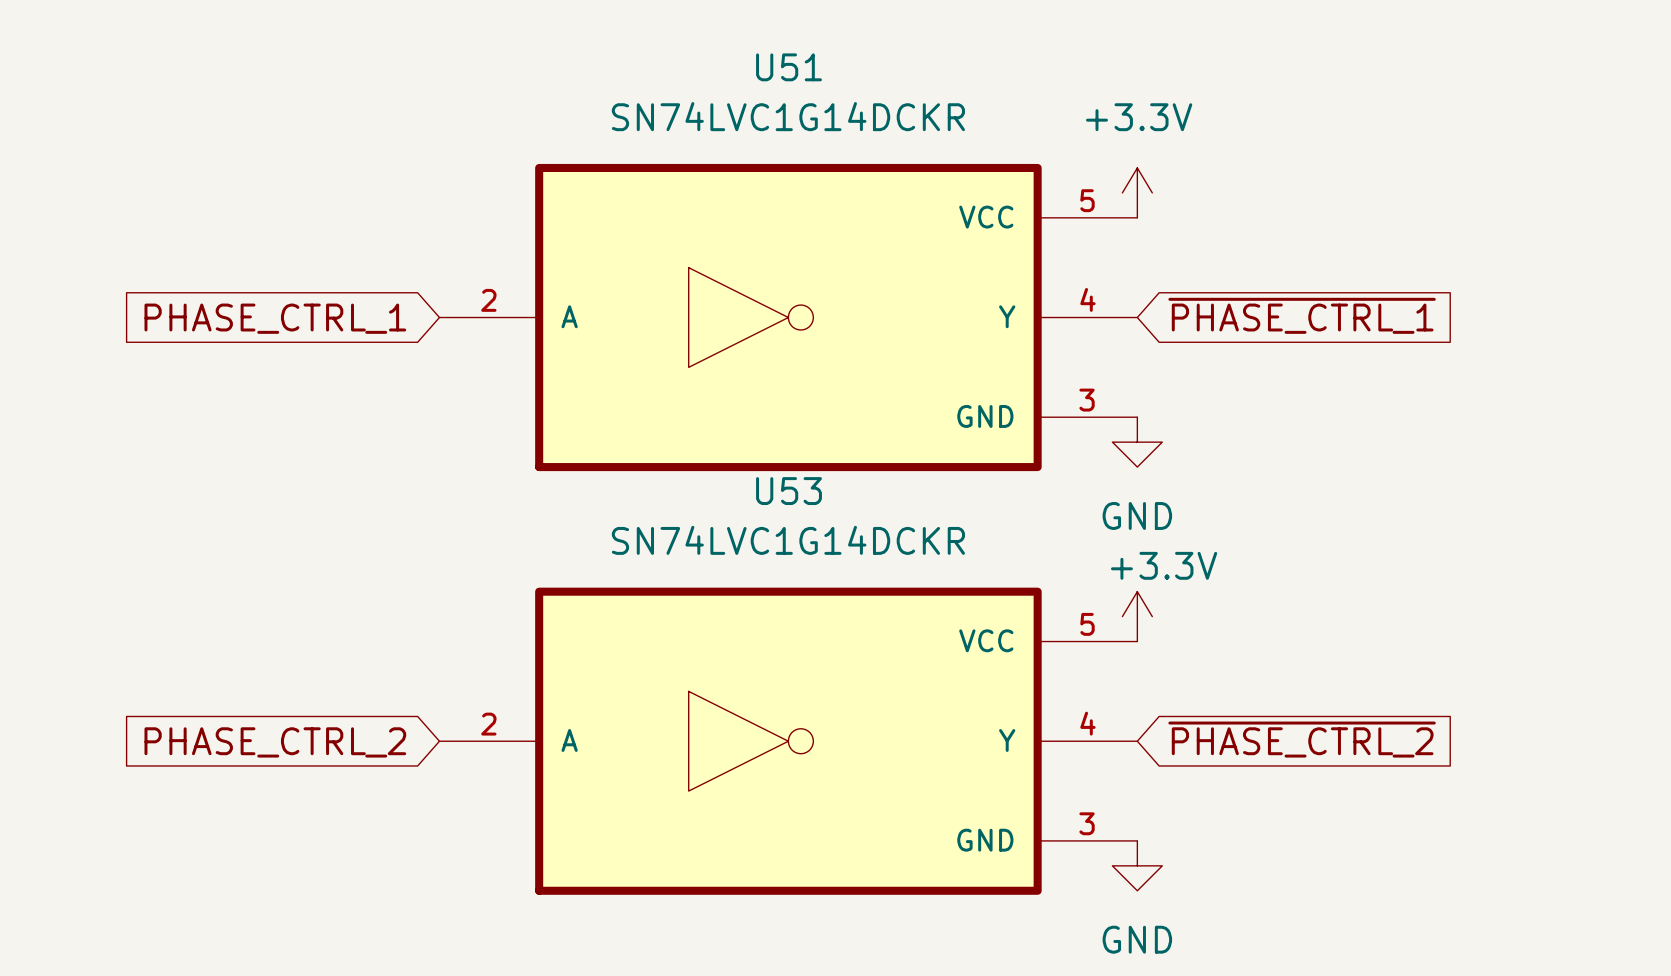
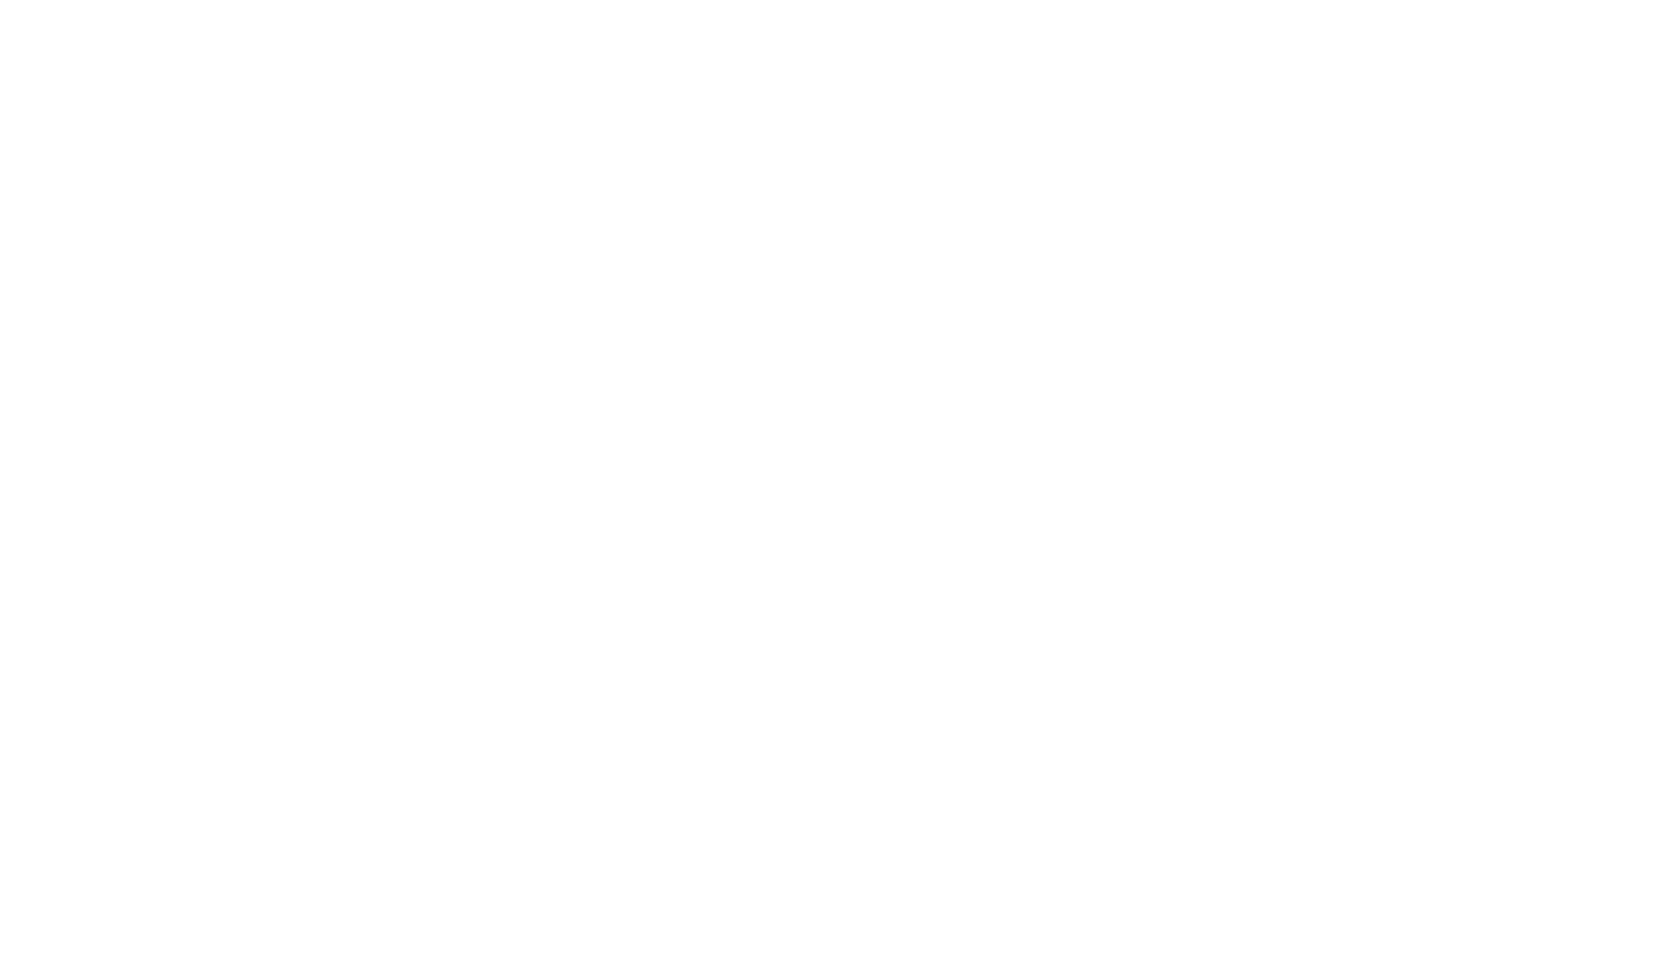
power symbol: +3.3V (1137, 192) -> none
global label: ~{PHASE_CTRL_1} (1302, 315) -> none
U51: SN74LVC1G14DCKR (788, 317) -> none
global label: PHASE_CTRL_1 (275, 318) -> none
power symbol: GND (1137, 442) -> none
power symbol: +3.3V (1137, 616) -> none
global label: ~{PHASE_CTRL_2} (1302, 739) -> none
U53: SN74LVC1G14DCKR (788, 741) -> none
global label: PHASE_CTRL_2 (275, 742) -> none
power symbol: GND (1137, 865) -> none

